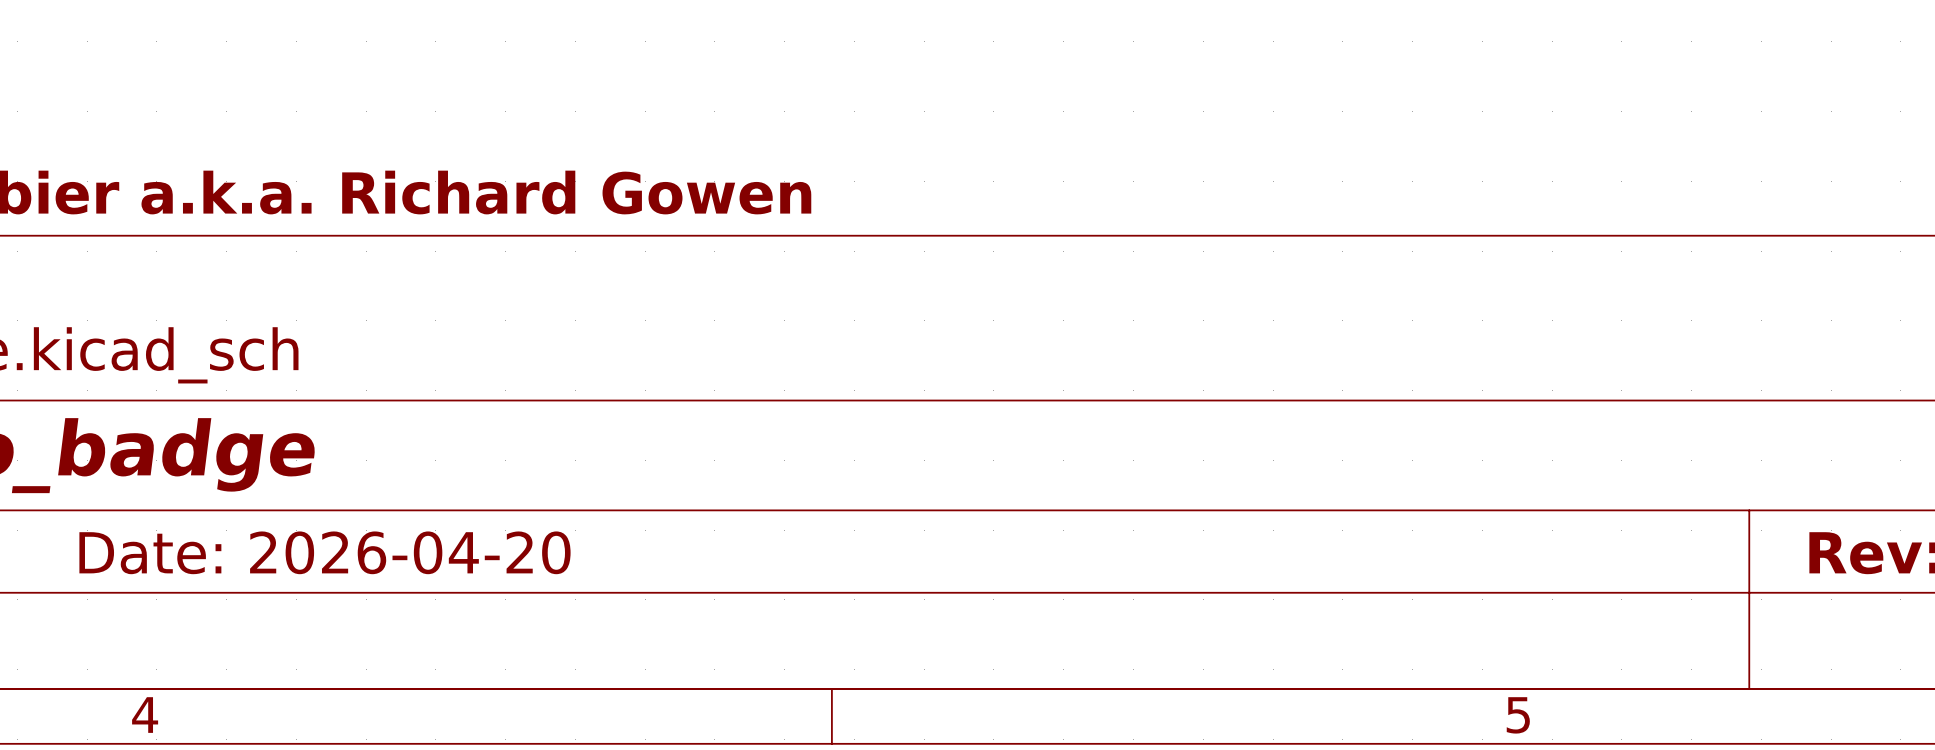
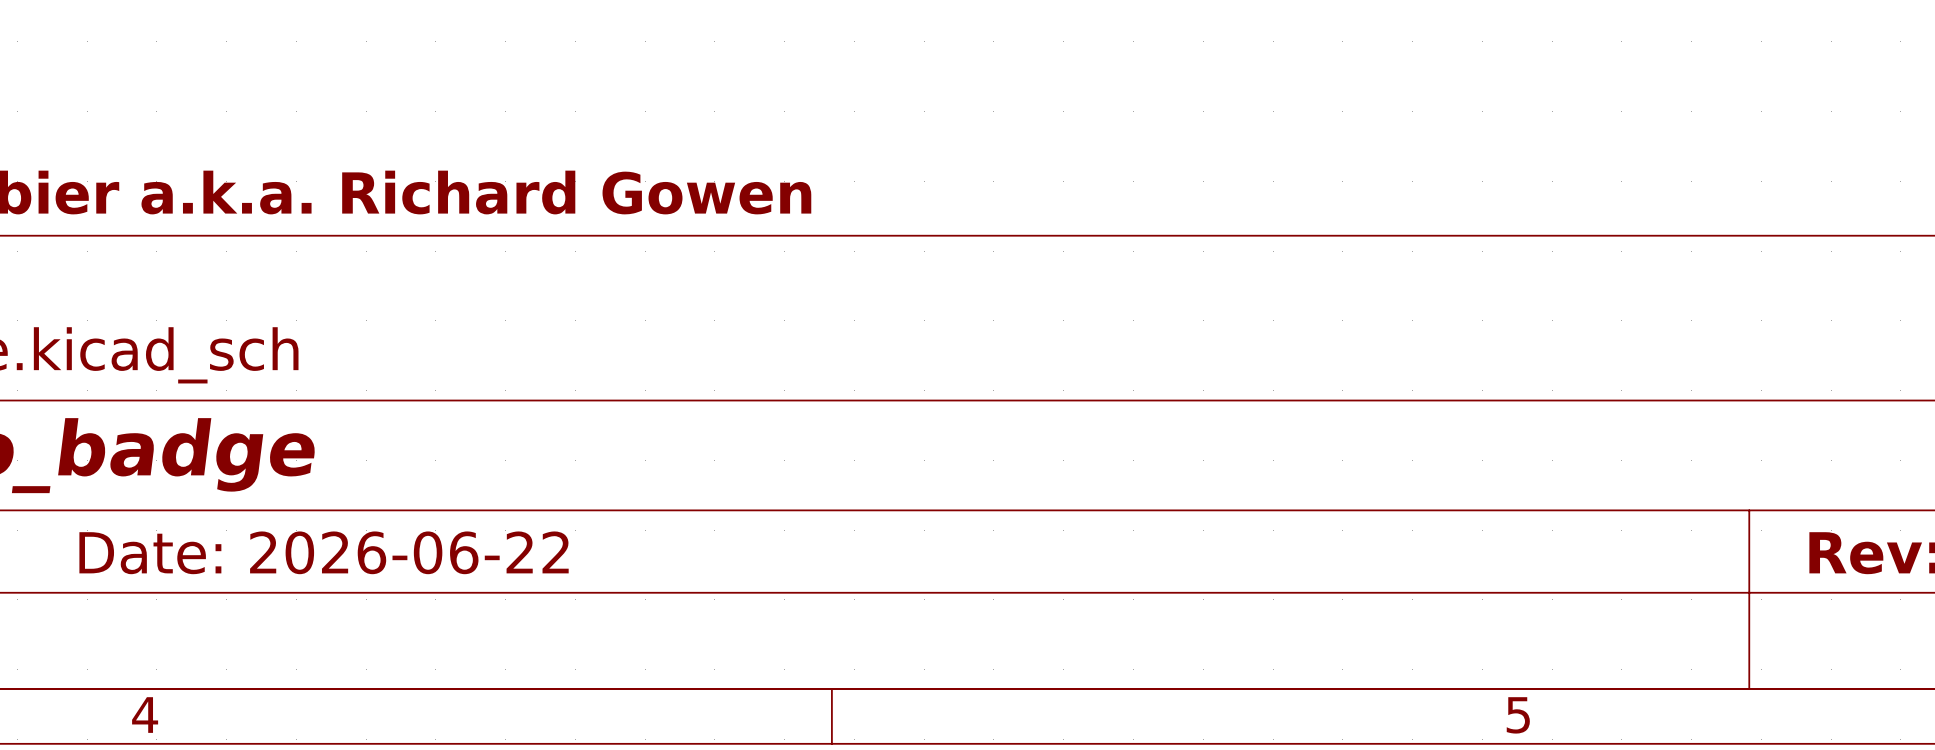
title block: Date: 2026-04-20 (325, 552) -> Date: 2026-06-22 (324, 552)

